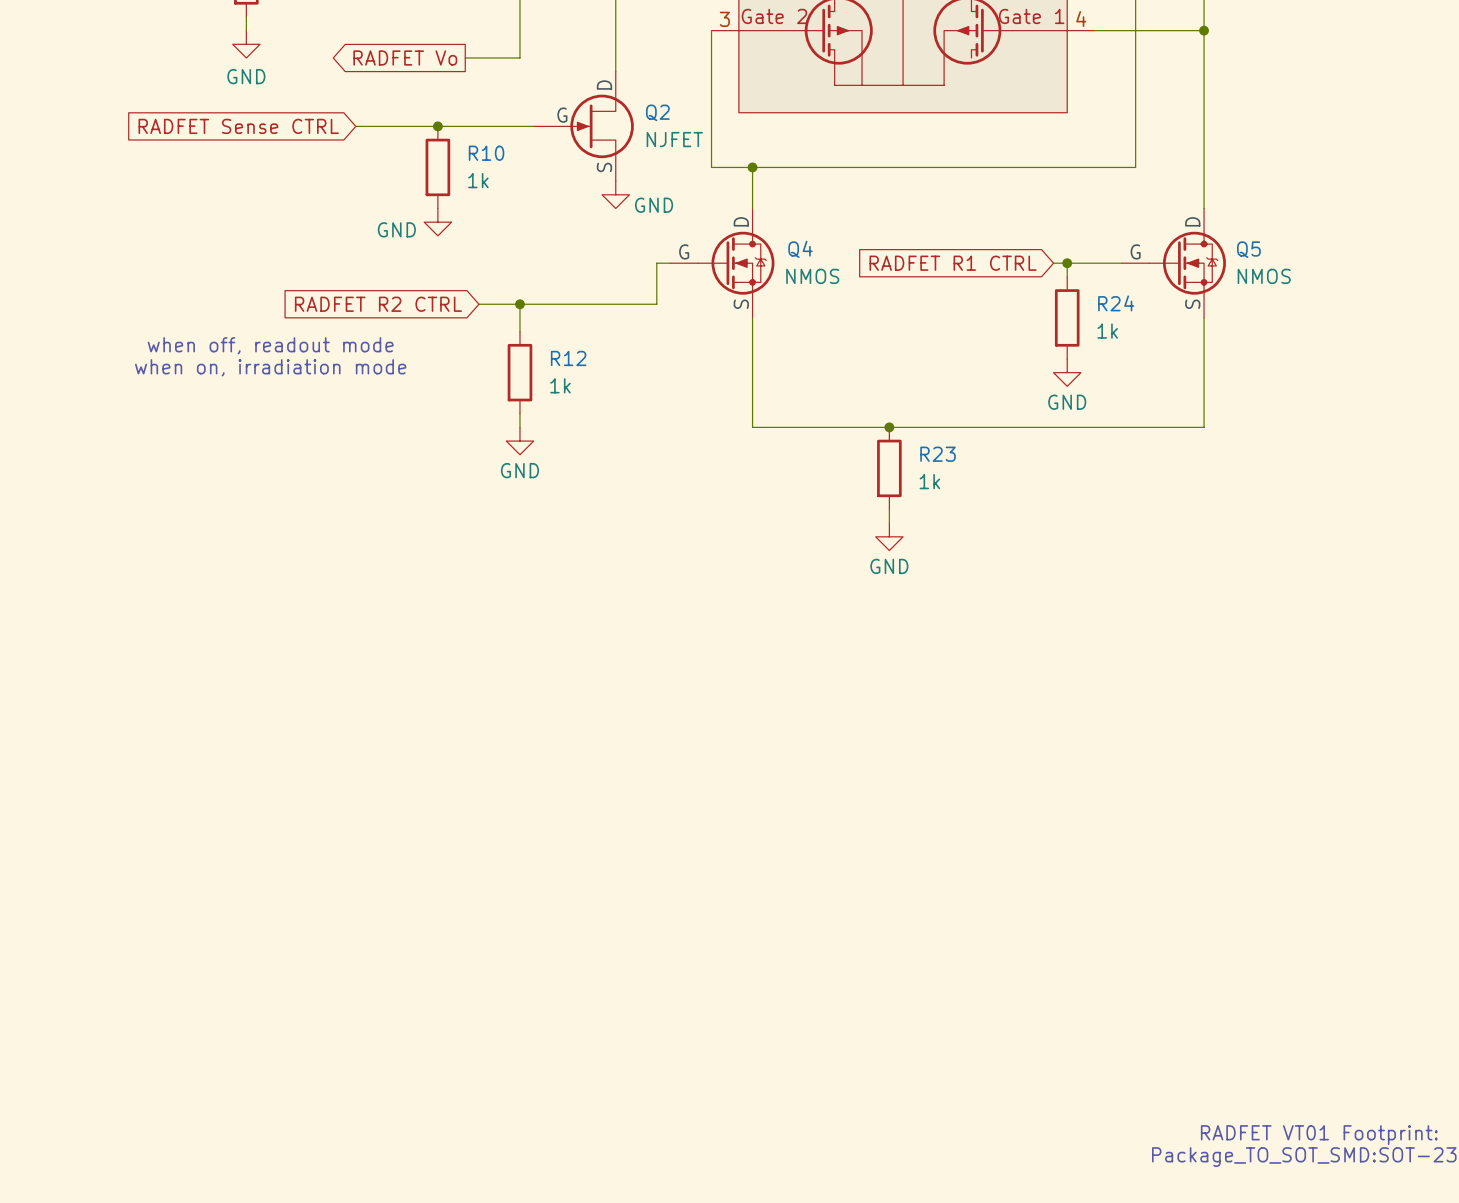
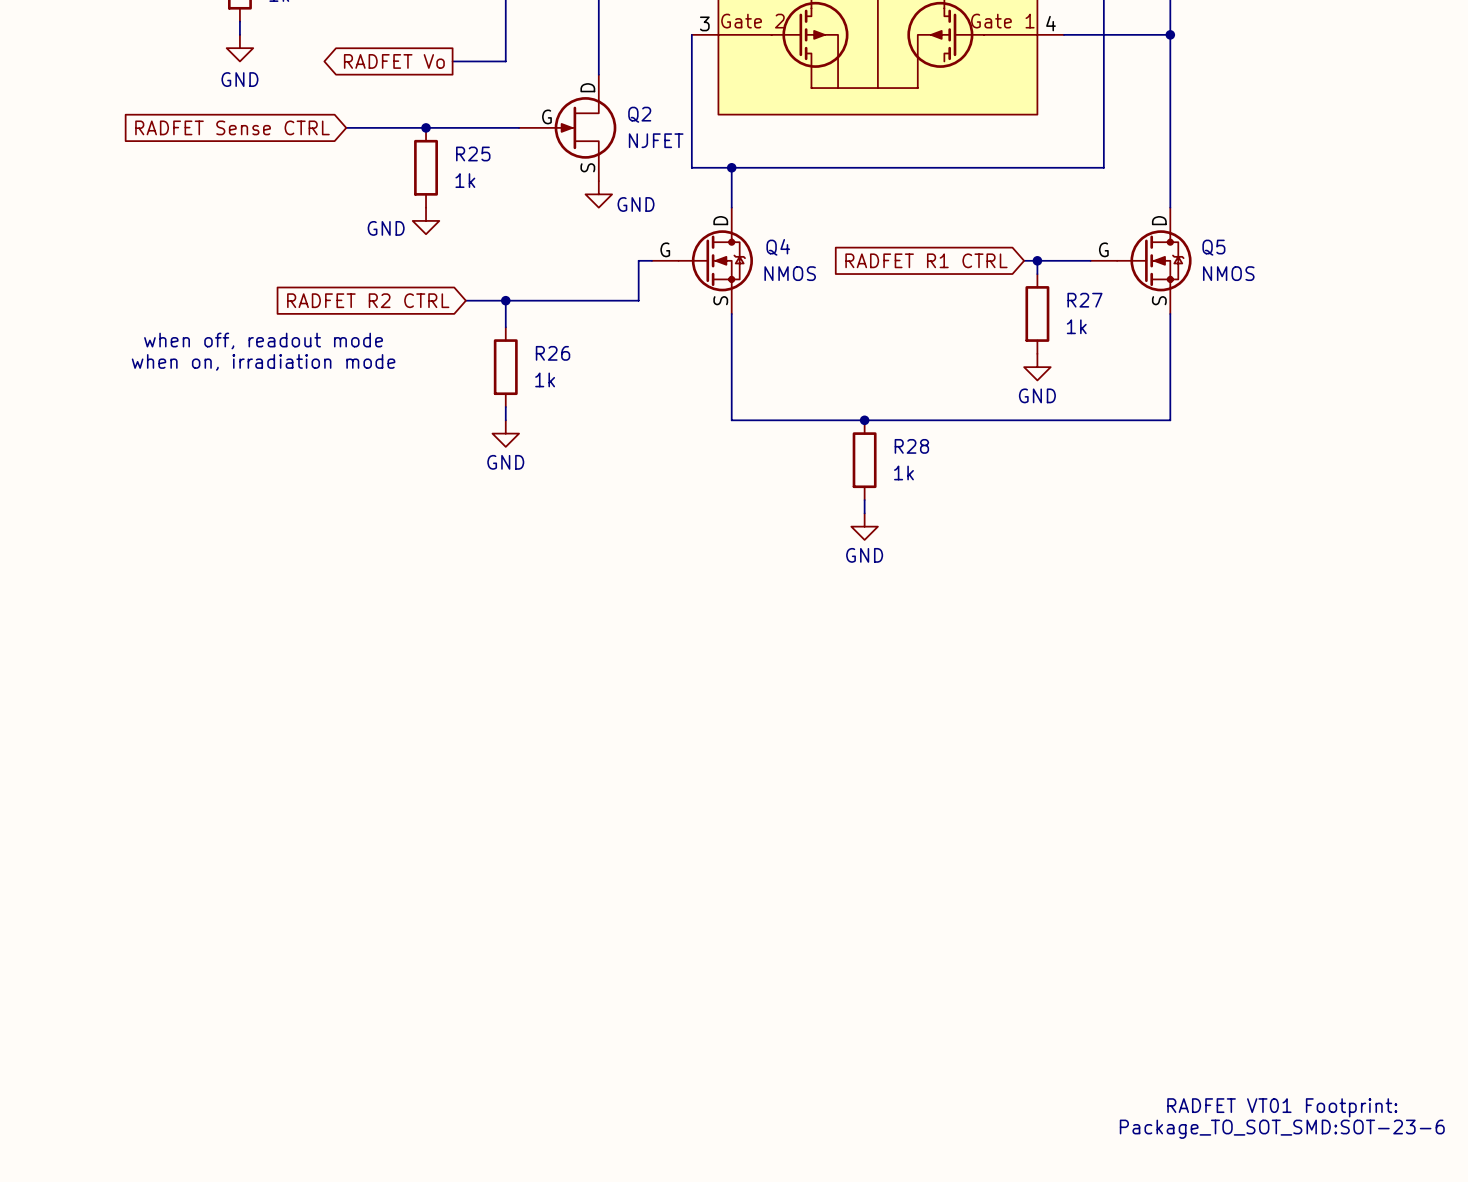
R10 name: R10 (486, 153) -> R25 (473, 153)
R24 name: R24 (1116, 303) -> R27 (1084, 300)
R12 name: R12 (568, 358) -> R26 (553, 353)
R23 name: R23 (938, 454) -> R28 (911, 446)

